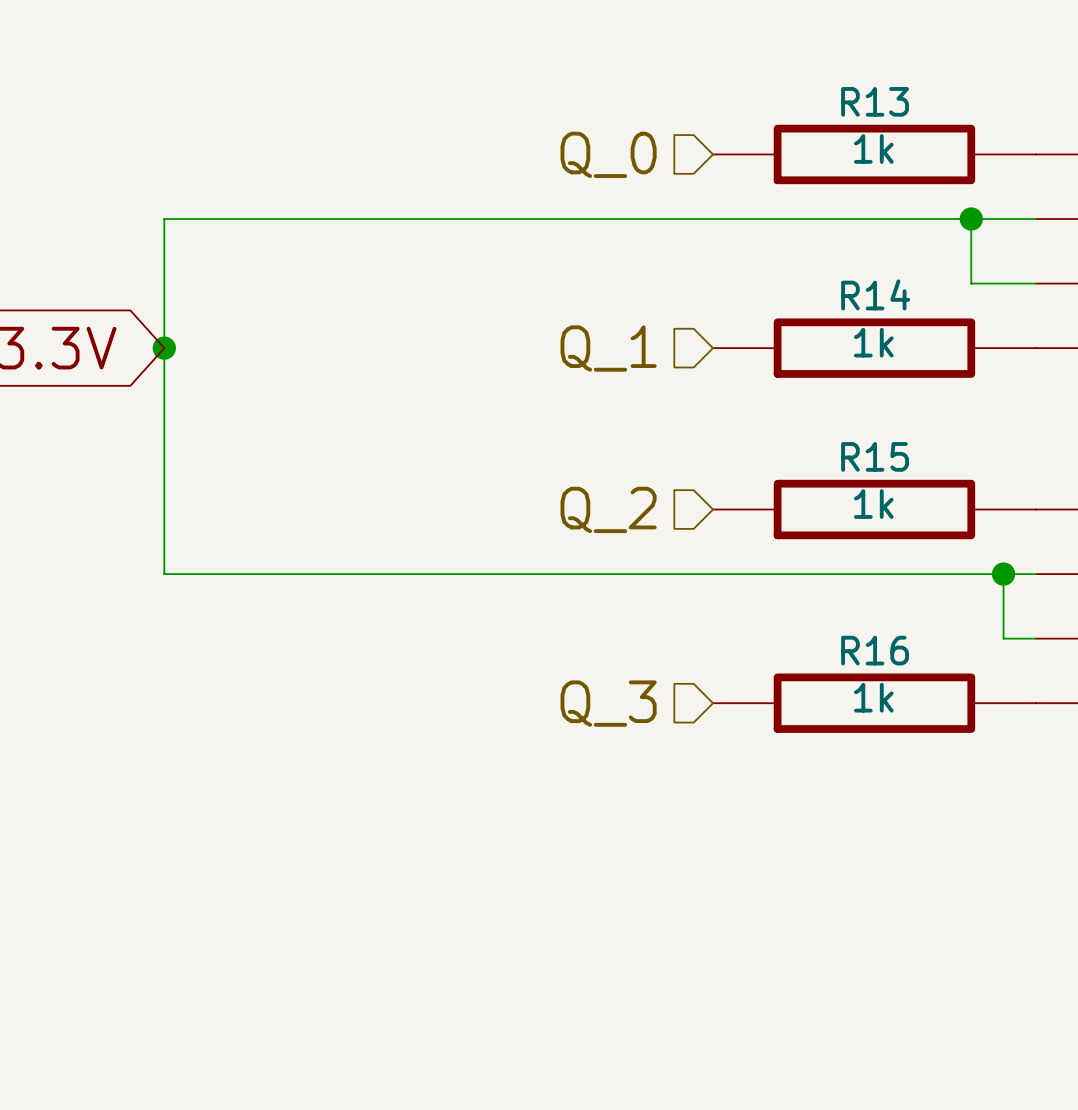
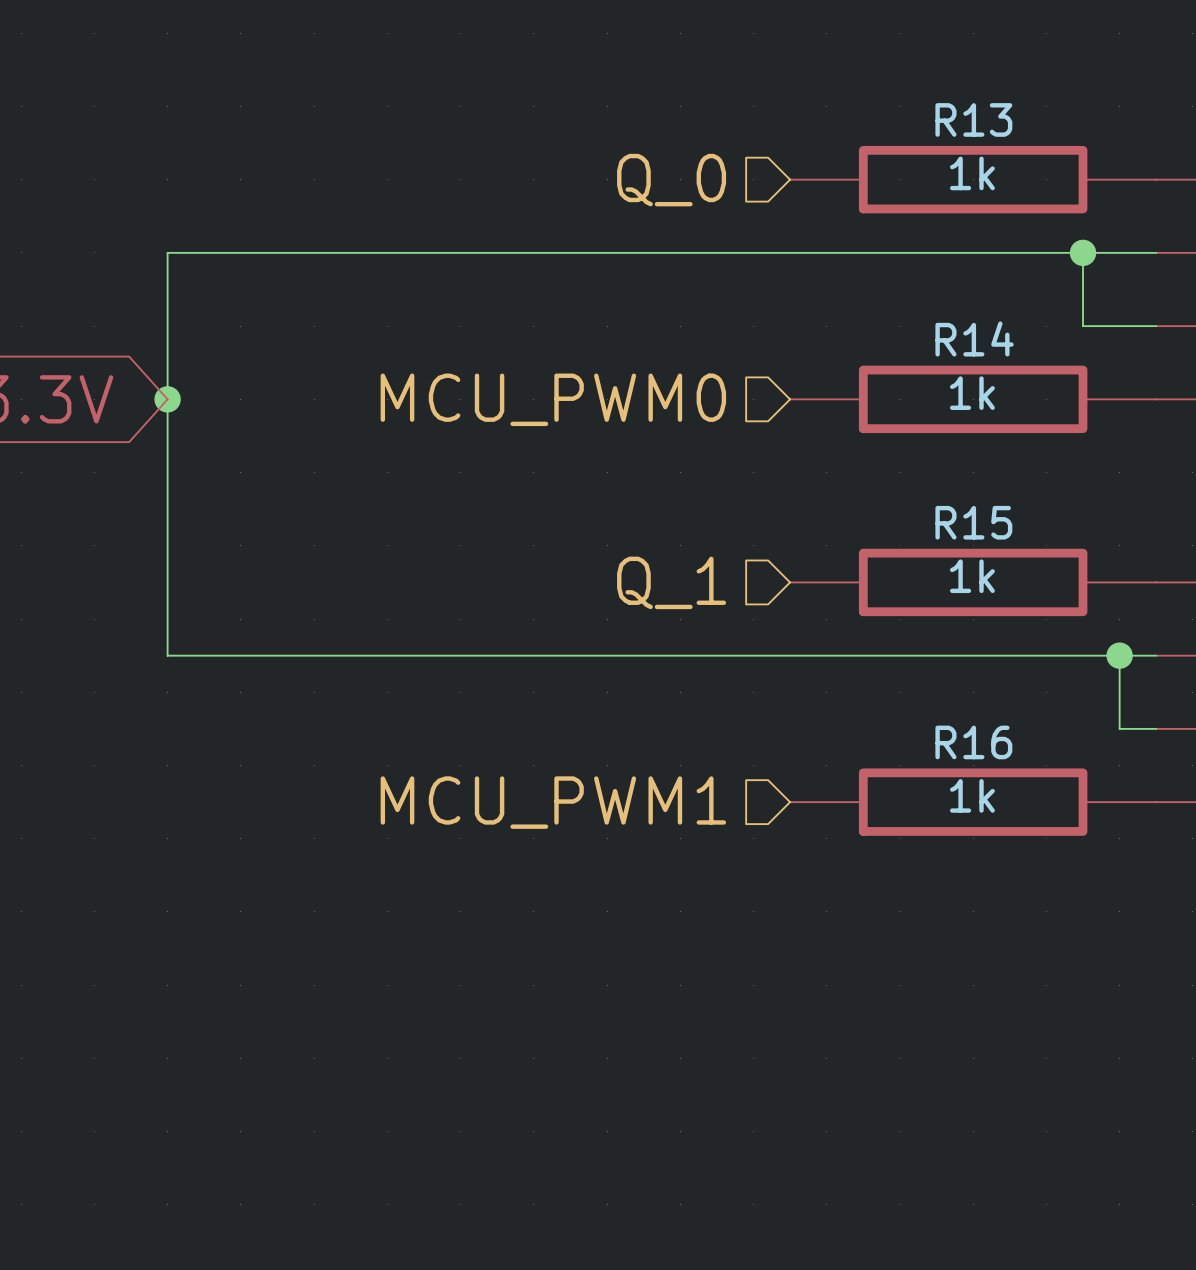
hierarchical label: Q_1 (608, 348) -> MCU_PWM0 (553, 399)
hierarchical label: Q_2 (608, 509) -> Q_1 (671, 582)
hierarchical label: Q_3 (608, 703) -> MCU_PWM1 (553, 802)

